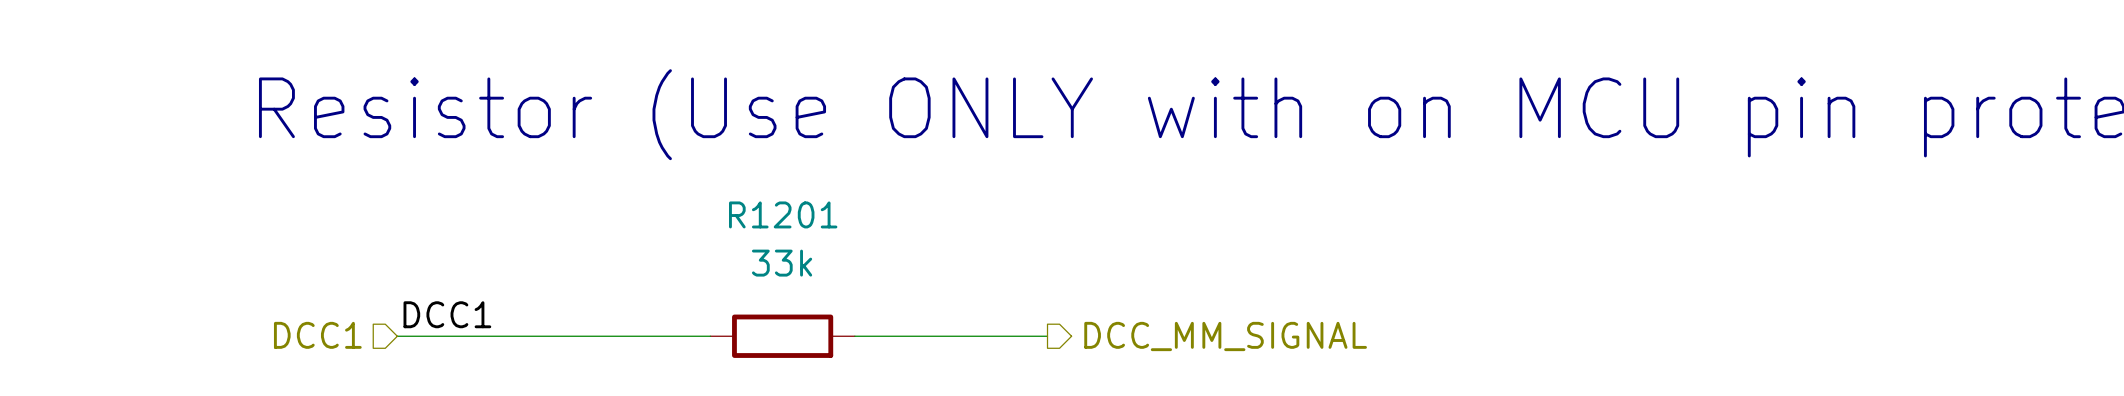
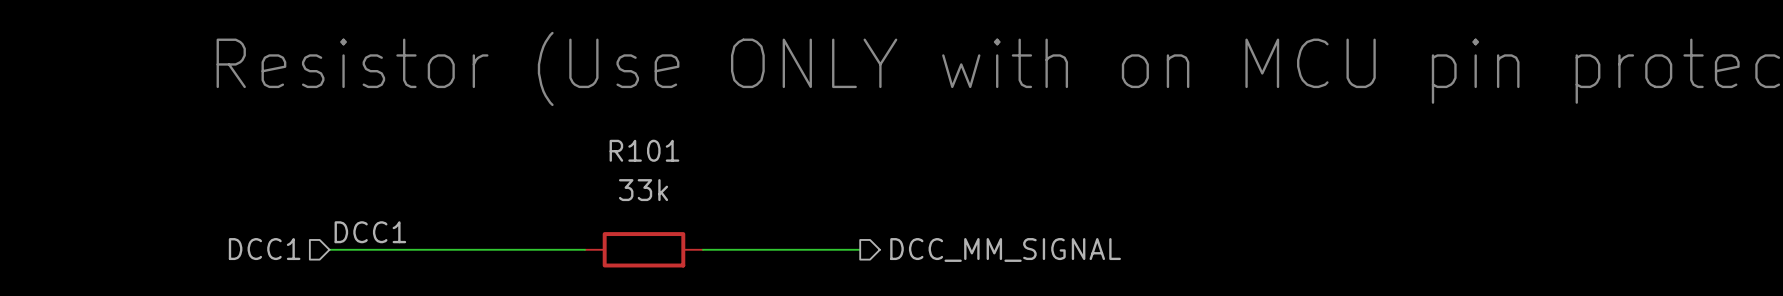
R1201 name: R1201 (783, 214) -> R101 (644, 150)

